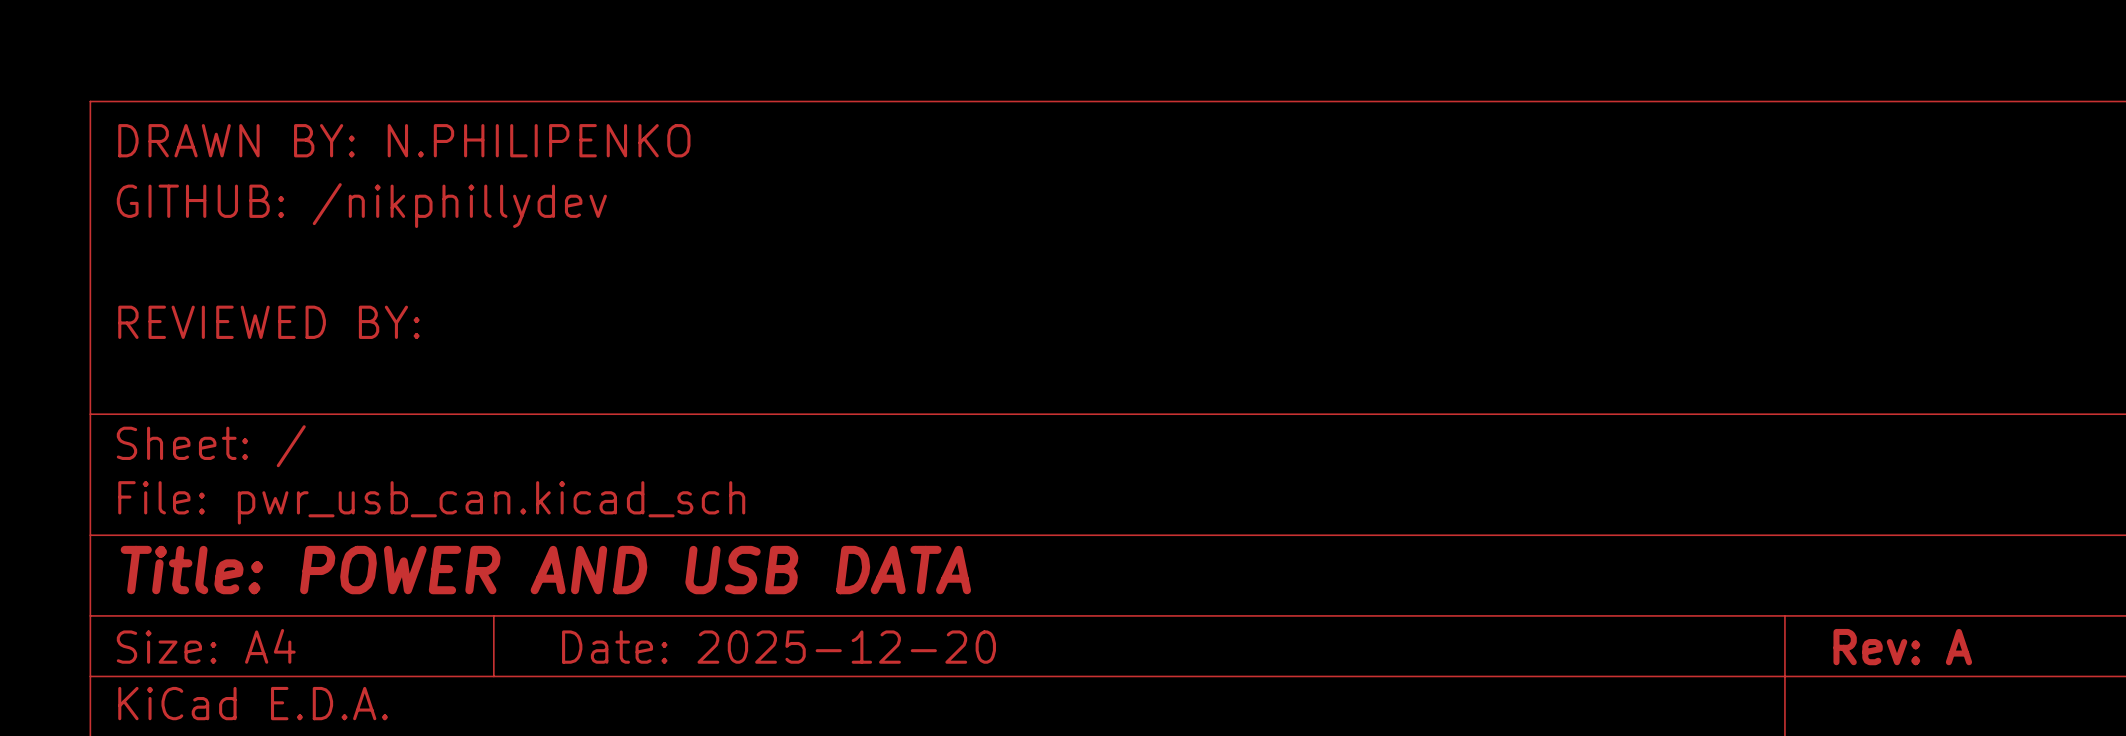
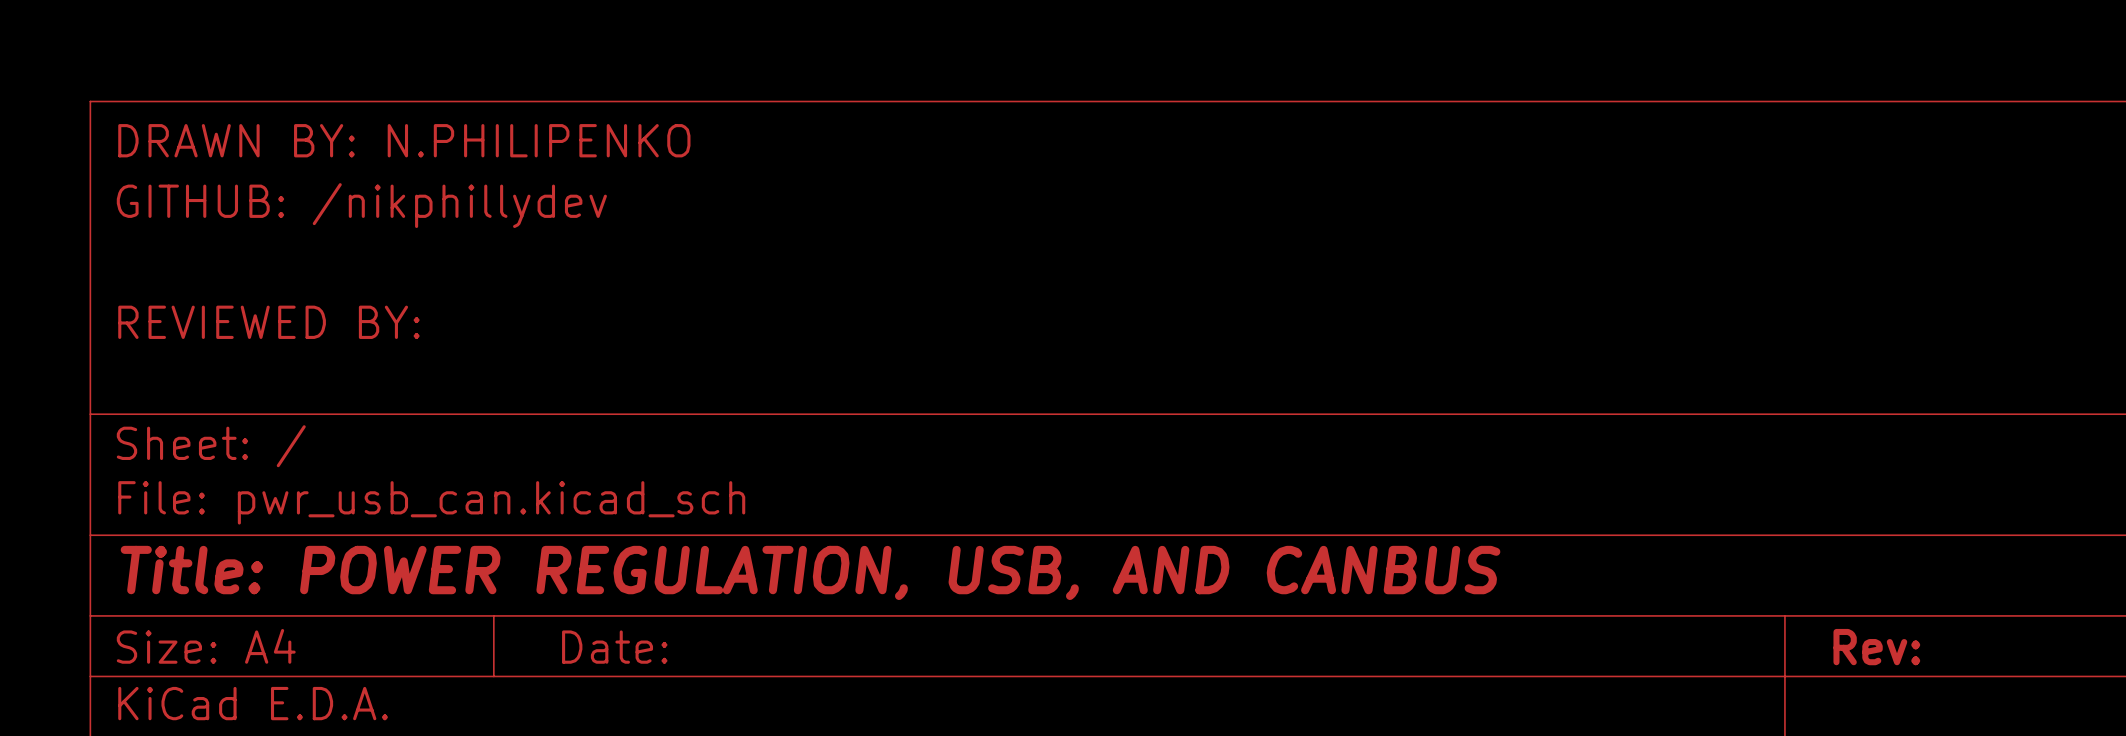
title block: Title: POWER AND USB DATA (545, 570) -> Title: POWER REGULATION, USB, AND CANBUS (810, 572)
title block: Date: 2025-12-20 (779, 647) -> Date: (614, 647)
title block: Rev: A (1902, 647) -> Rev: (1876, 647)

